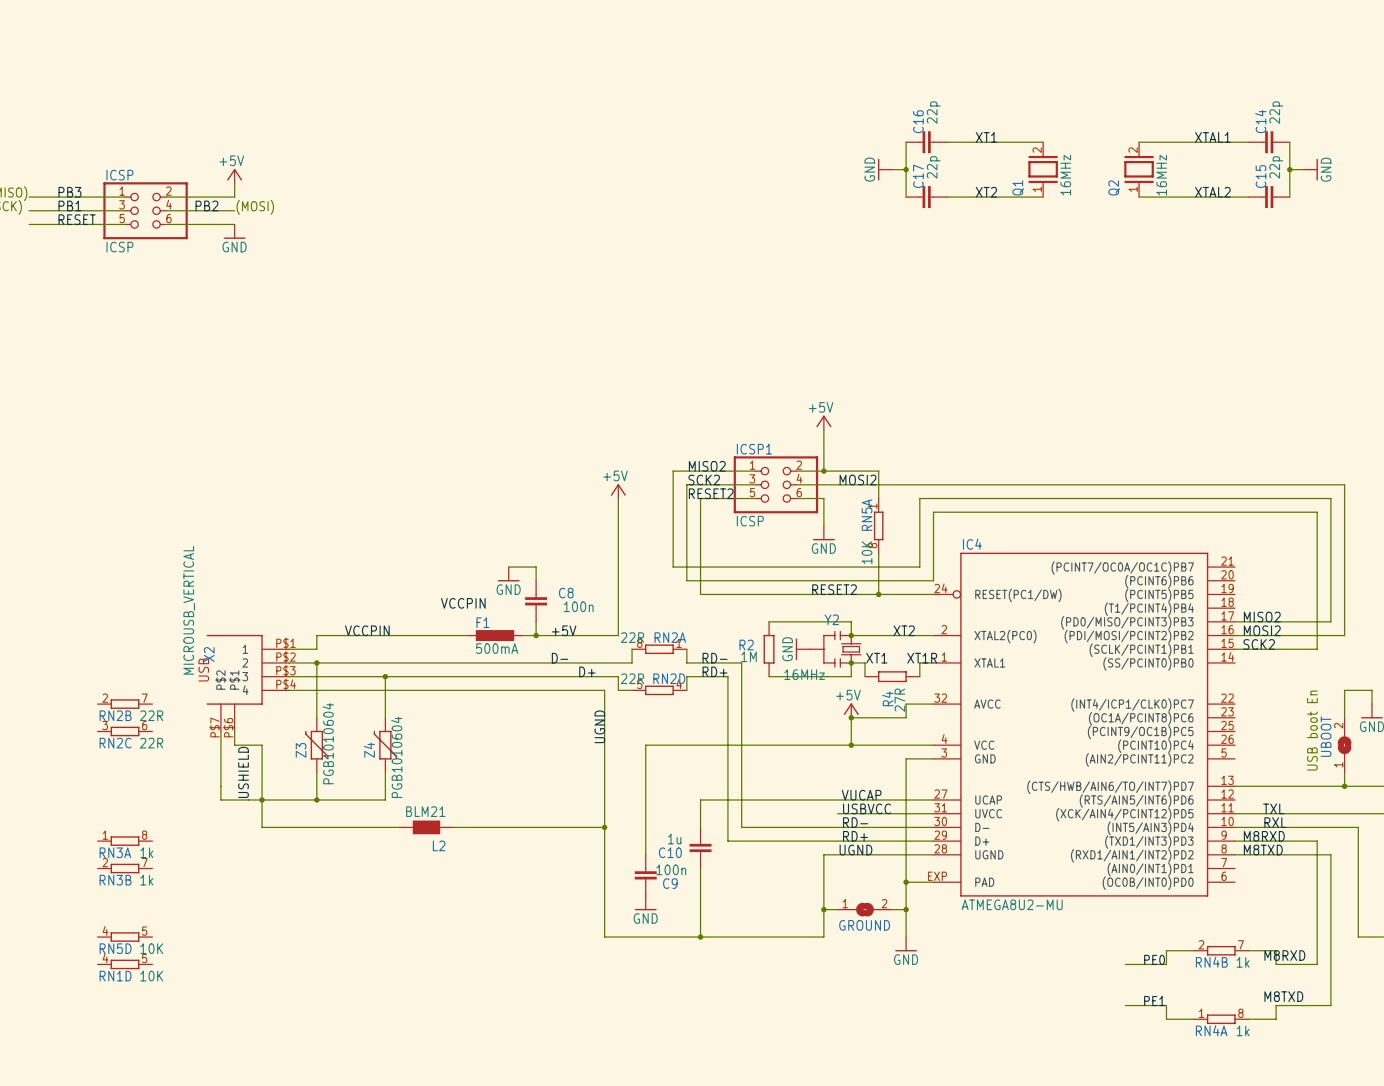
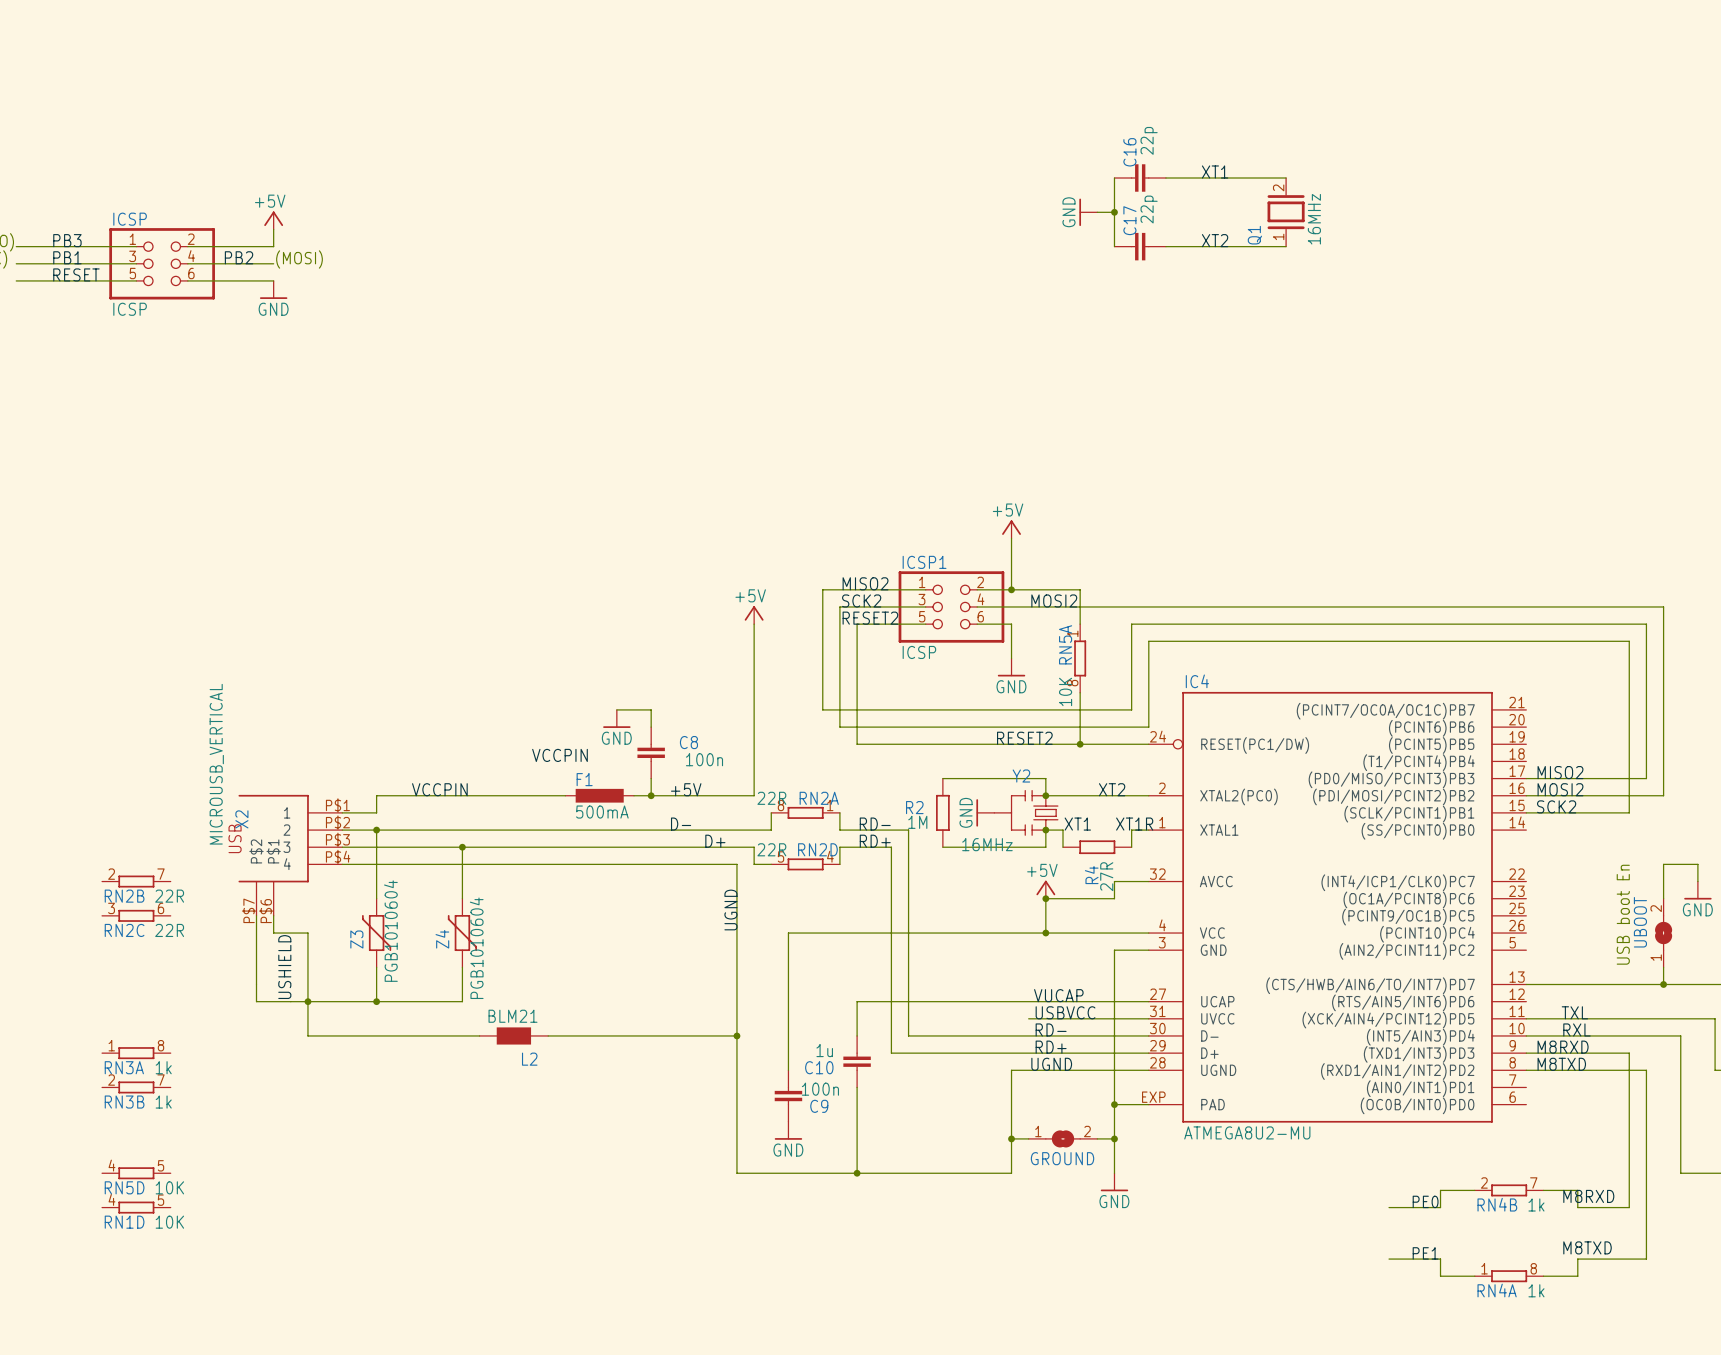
label: XTAL1 (1212, 137) -> none
wire: (1139, 142) (1248, 142) -> none
C14: 22p (1269, 142) -> none
wire: (1289, 142) (1289, 197) -> none
Q2: 16MHz (1139, 169) -> none
wire: (1289, 169) (1303, 169) -> none
junction: (1289, 169) -> none
power symbol: GND (1310, 169) -> none
label: XTAL2 (1212, 192) -> none
wire: (1139, 197) (1248, 197) -> none
C15: 22p (1269, 197) -> none

